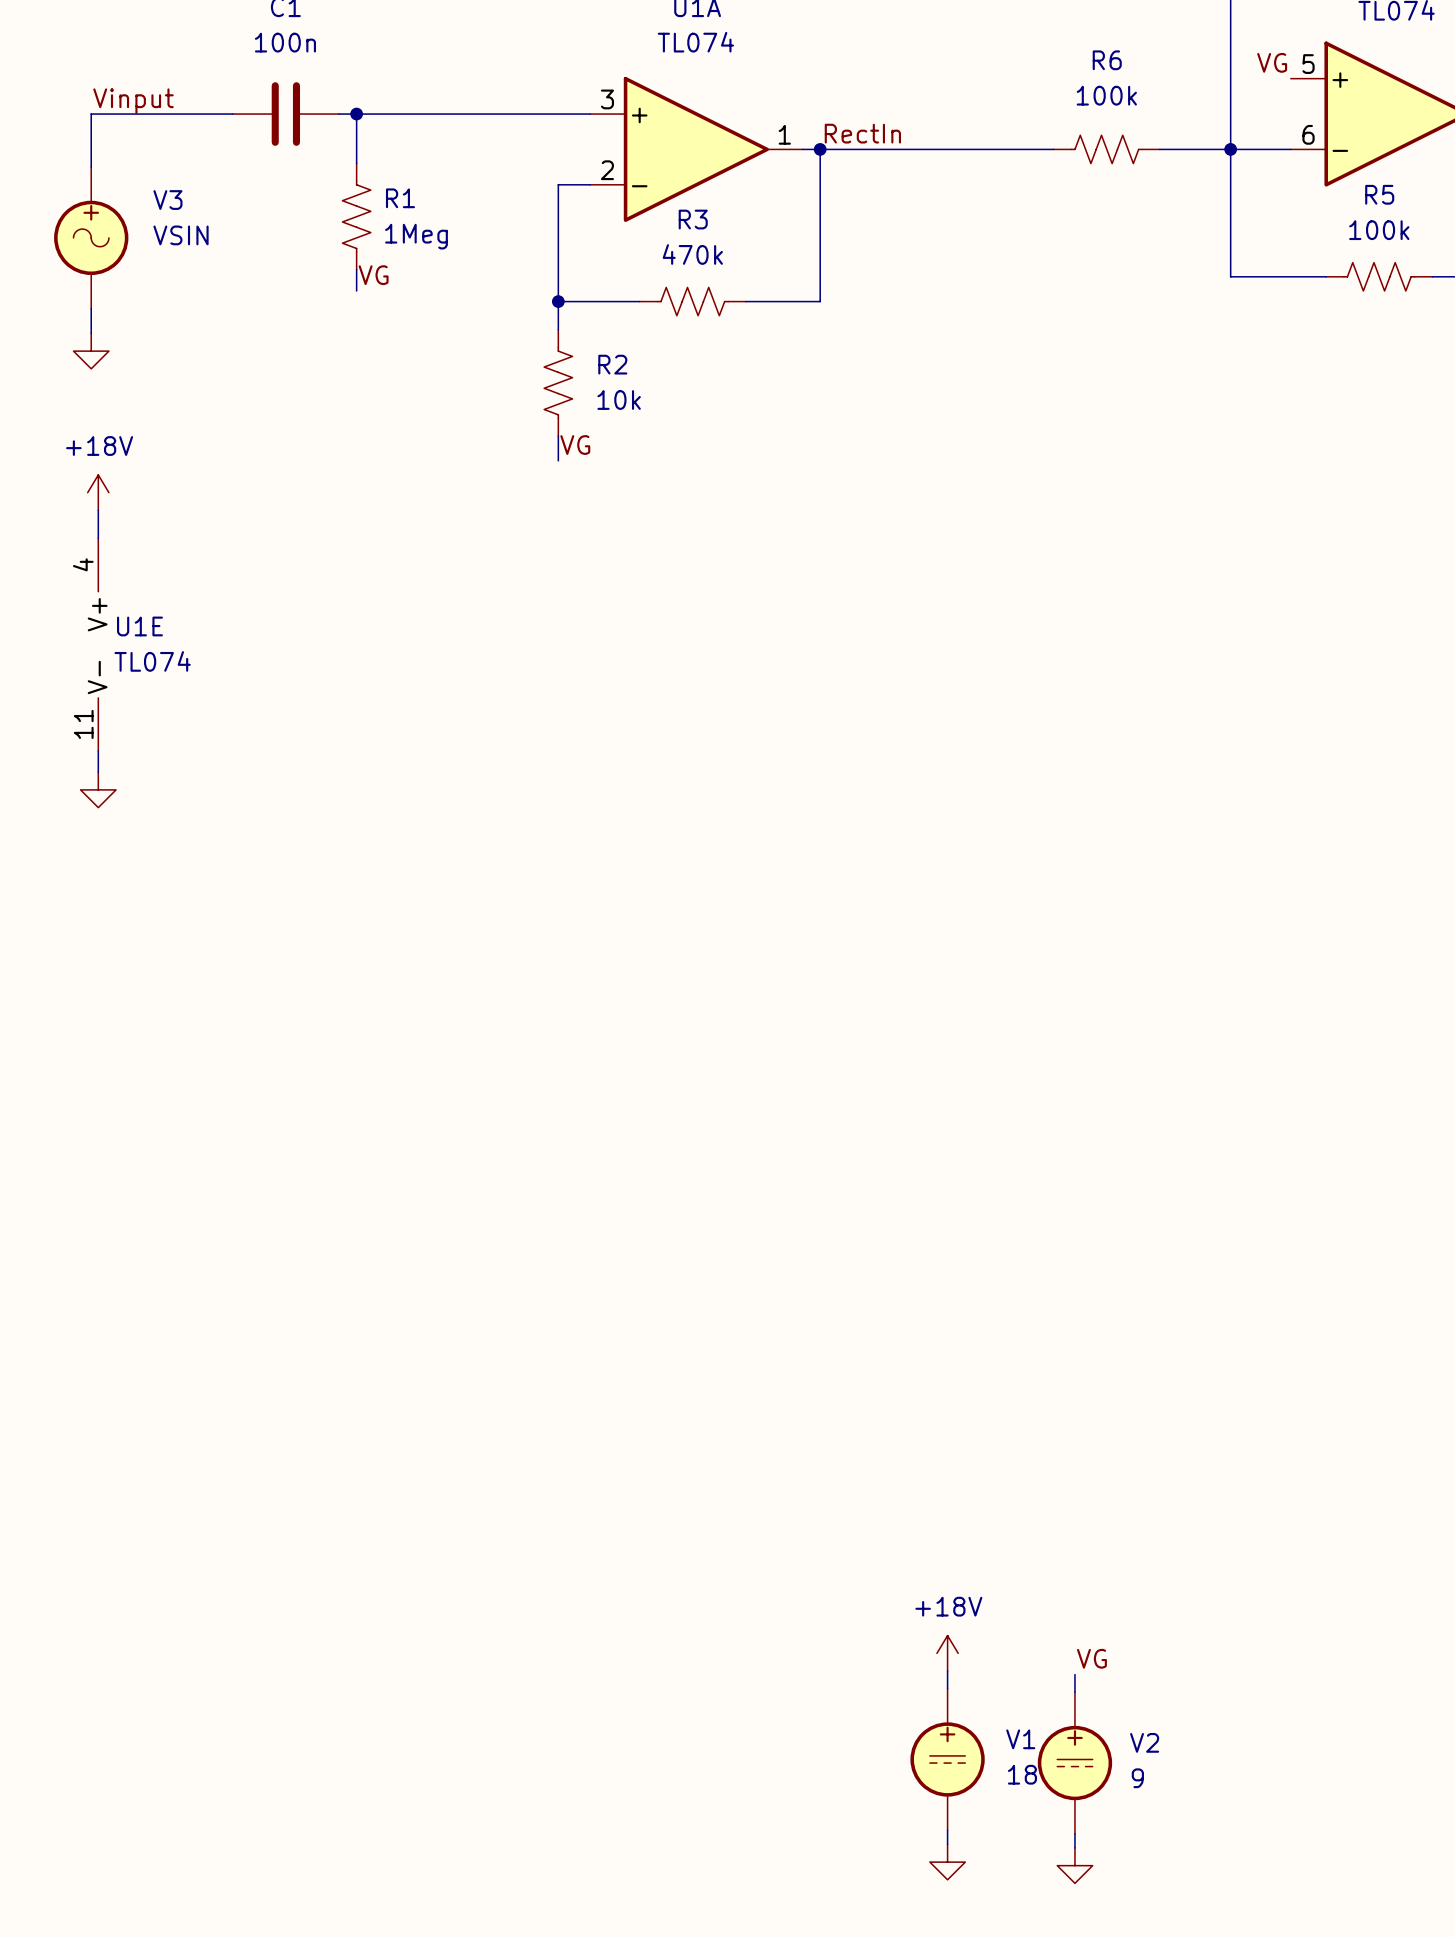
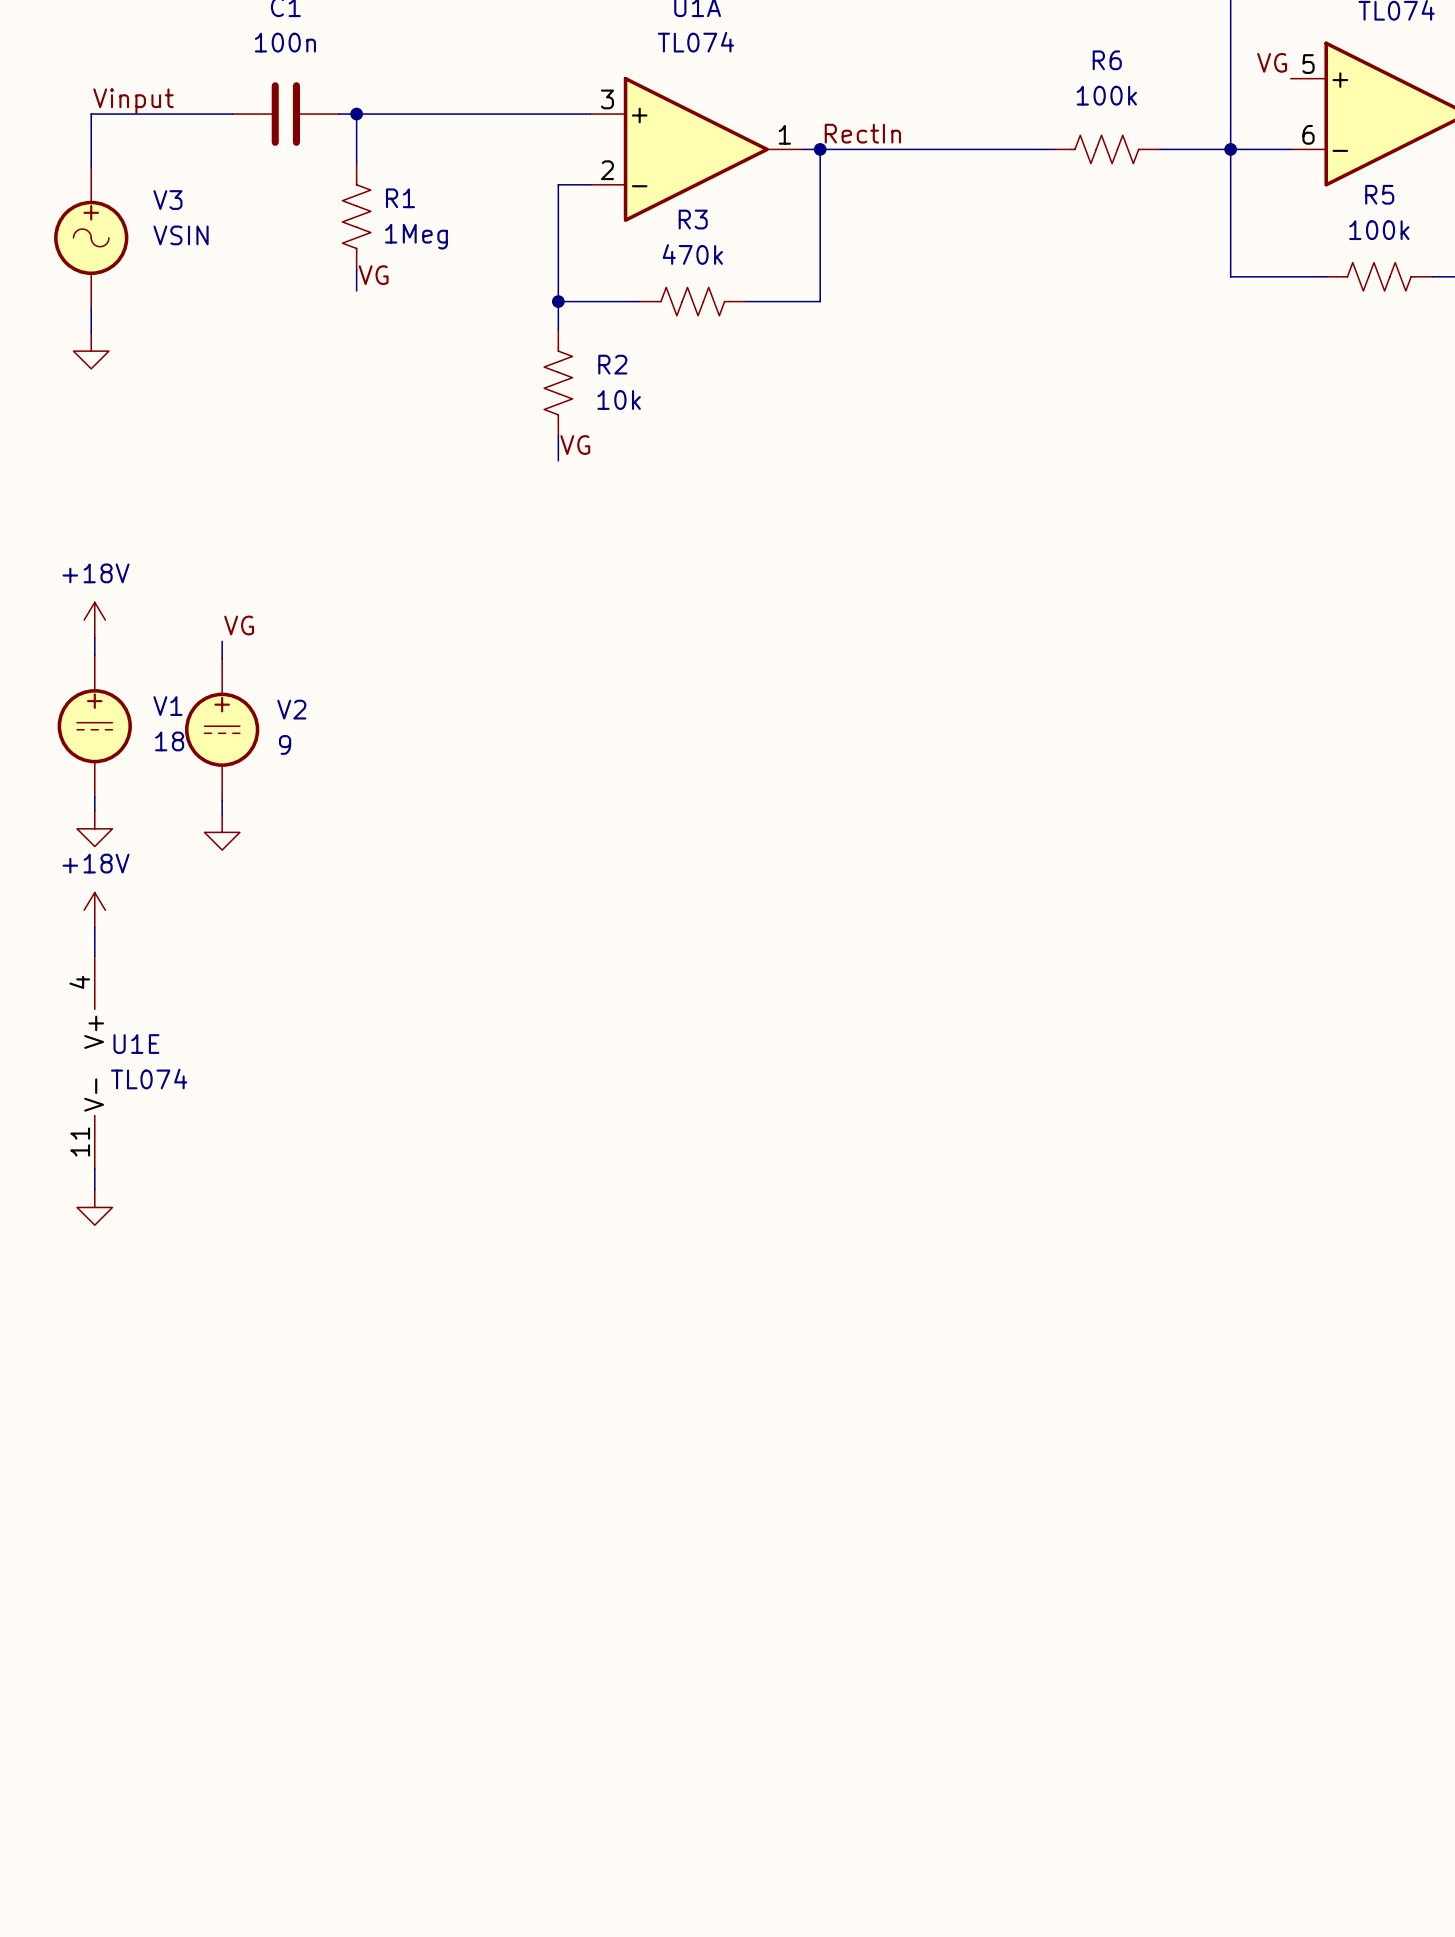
power symbol position: +18V (98, 492) -> +18V (94, 620)
wire: (98, 510) (98, 538) -> none
label: none -> VG (239, 625)
wire: none -> (94, 637) (94, 655)
wire: none -> (222, 641) (222, 658)
U1E position: (98, 644) -> (94, 1062)
power symbol position: (98, 789) -> (94, 828)
wire: none -> (94, 796) (94, 811)
wire: none -> (222, 800) (222, 814)
power symbol: none -> (222, 832)
power symbol: none -> +18V (94, 910)
wire: none -> (94, 927) (94, 956)
wire: none -> (94, 1168) (94, 1189)
power symbol: none -> (94, 1207)
power symbol: +18V (947, 1653) -> none
label: VG (1091, 1658) -> none
wire: (947, 1671) (947, 1688) -> none
wire: (1074, 1674) (1074, 1692) -> none
V1 position: (947, 1759) -> (94, 726)
V2 position: (1074, 1763) -> (222, 729)
wire: (947, 1830) (947, 1844) -> none
wire: (1074, 1833) (1074, 1847) -> none
power symbol: (947, 1862) -> none
power symbol: (1074, 1865) -> none

